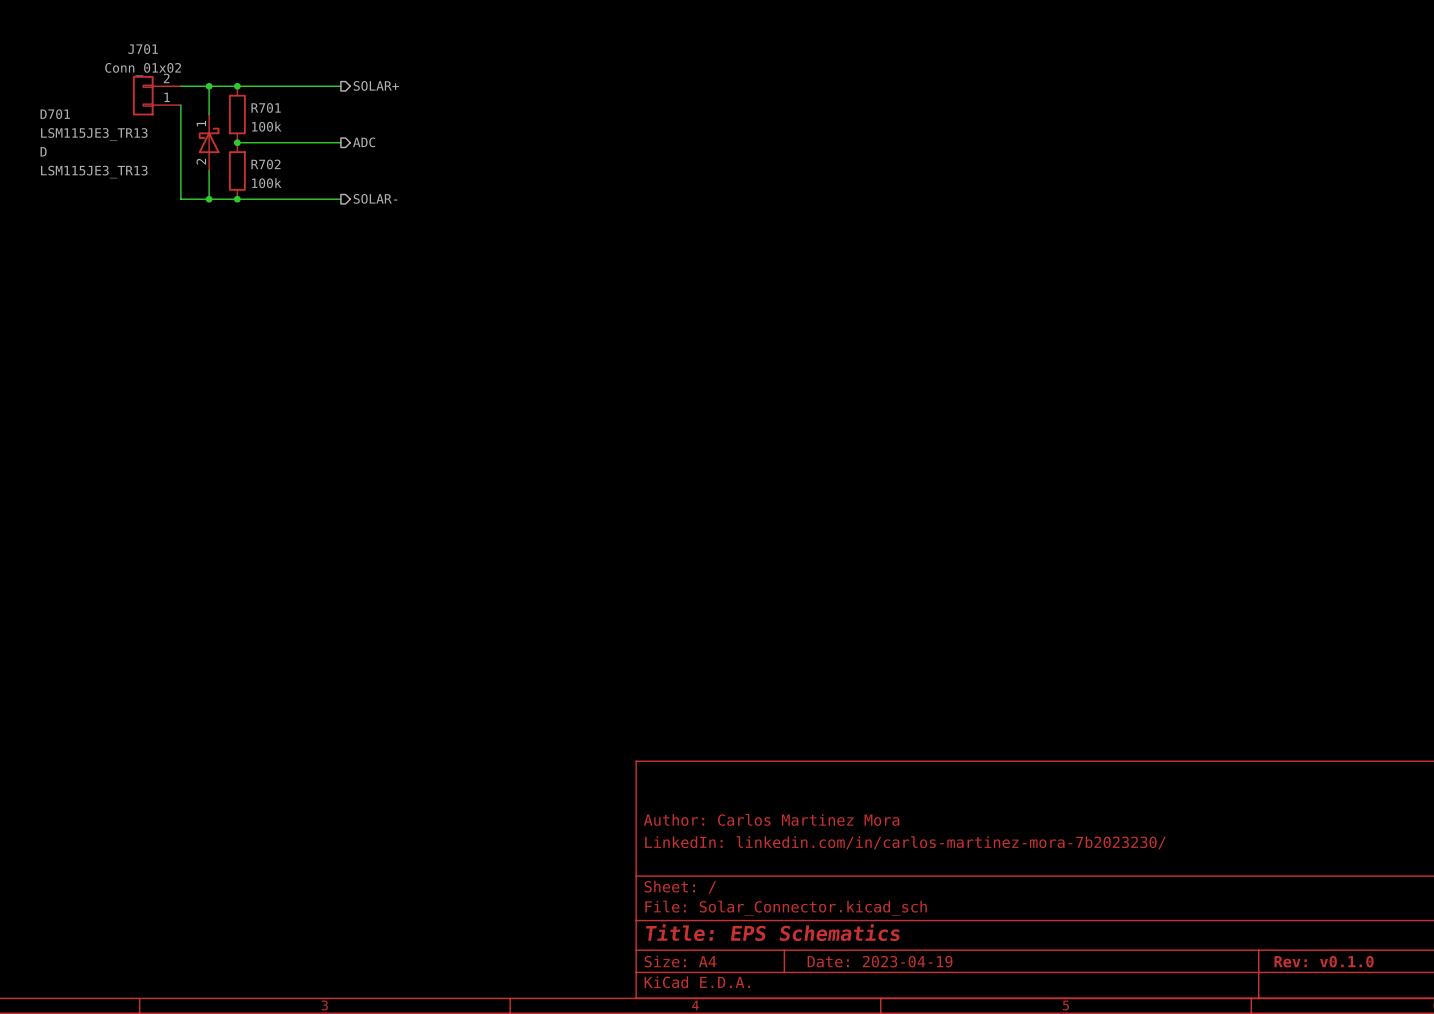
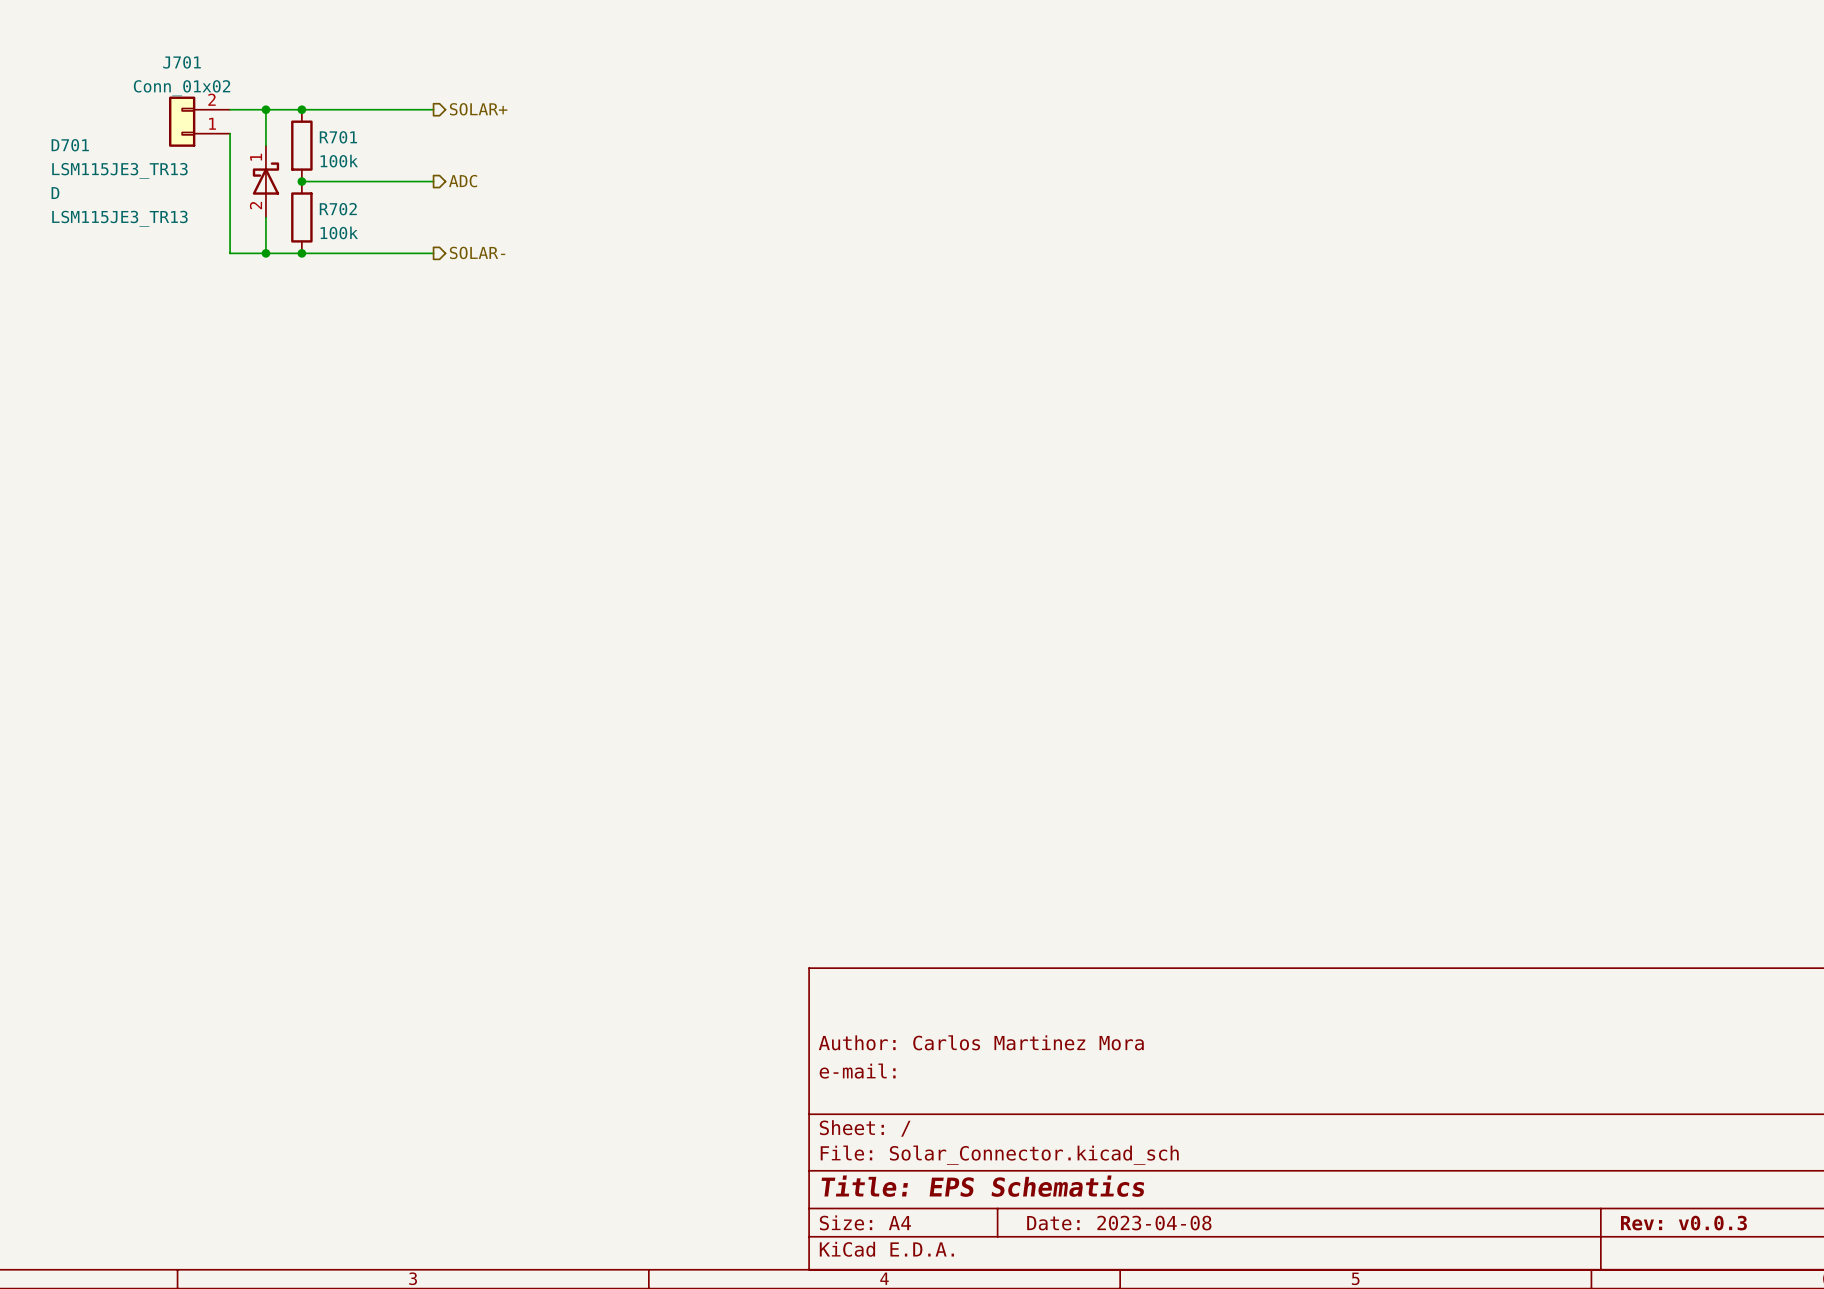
title block: LinkedIn: linkedin.com/in/carlos-martinez-mora-7b2023230/ (905, 842) -> e-mail: (857, 1071)
title block: Date: 2023-04-19 (880, 961) -> Date: 2023-04-08 (1119, 1223)
title block: Rev: v0.1.0 (1324, 961) -> Rev: v0.0.3 (1683, 1223)

